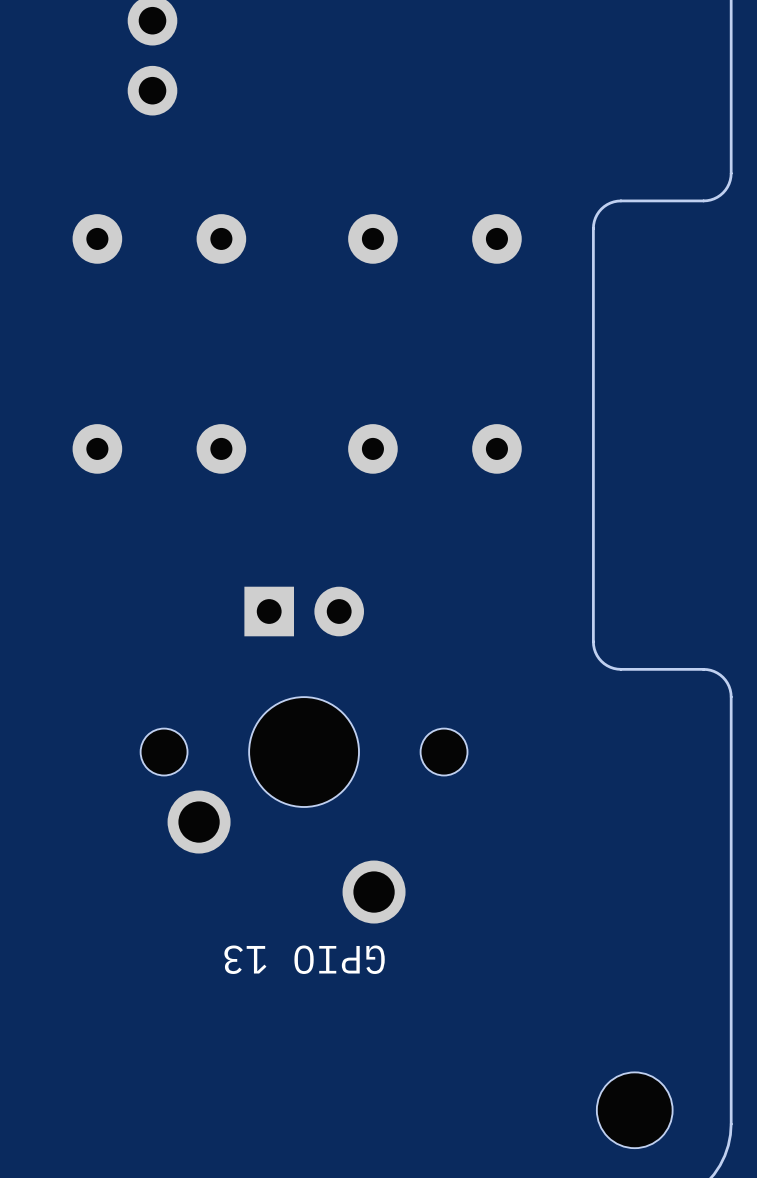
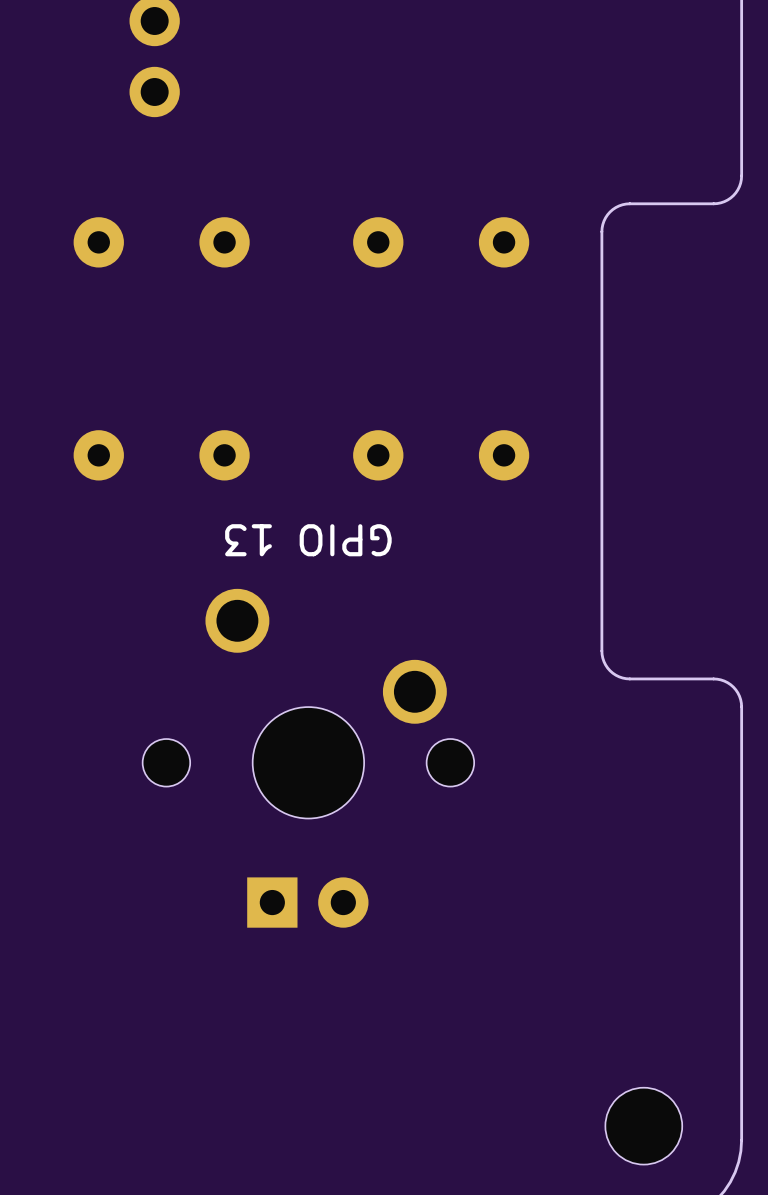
part position: (304, 611) -> (307, 902)
part rotation: 0° (304, 810) -> 180° (308, 703)
text position: GPIO 13 (304, 959) -> GPIO 13 (308, 540)

